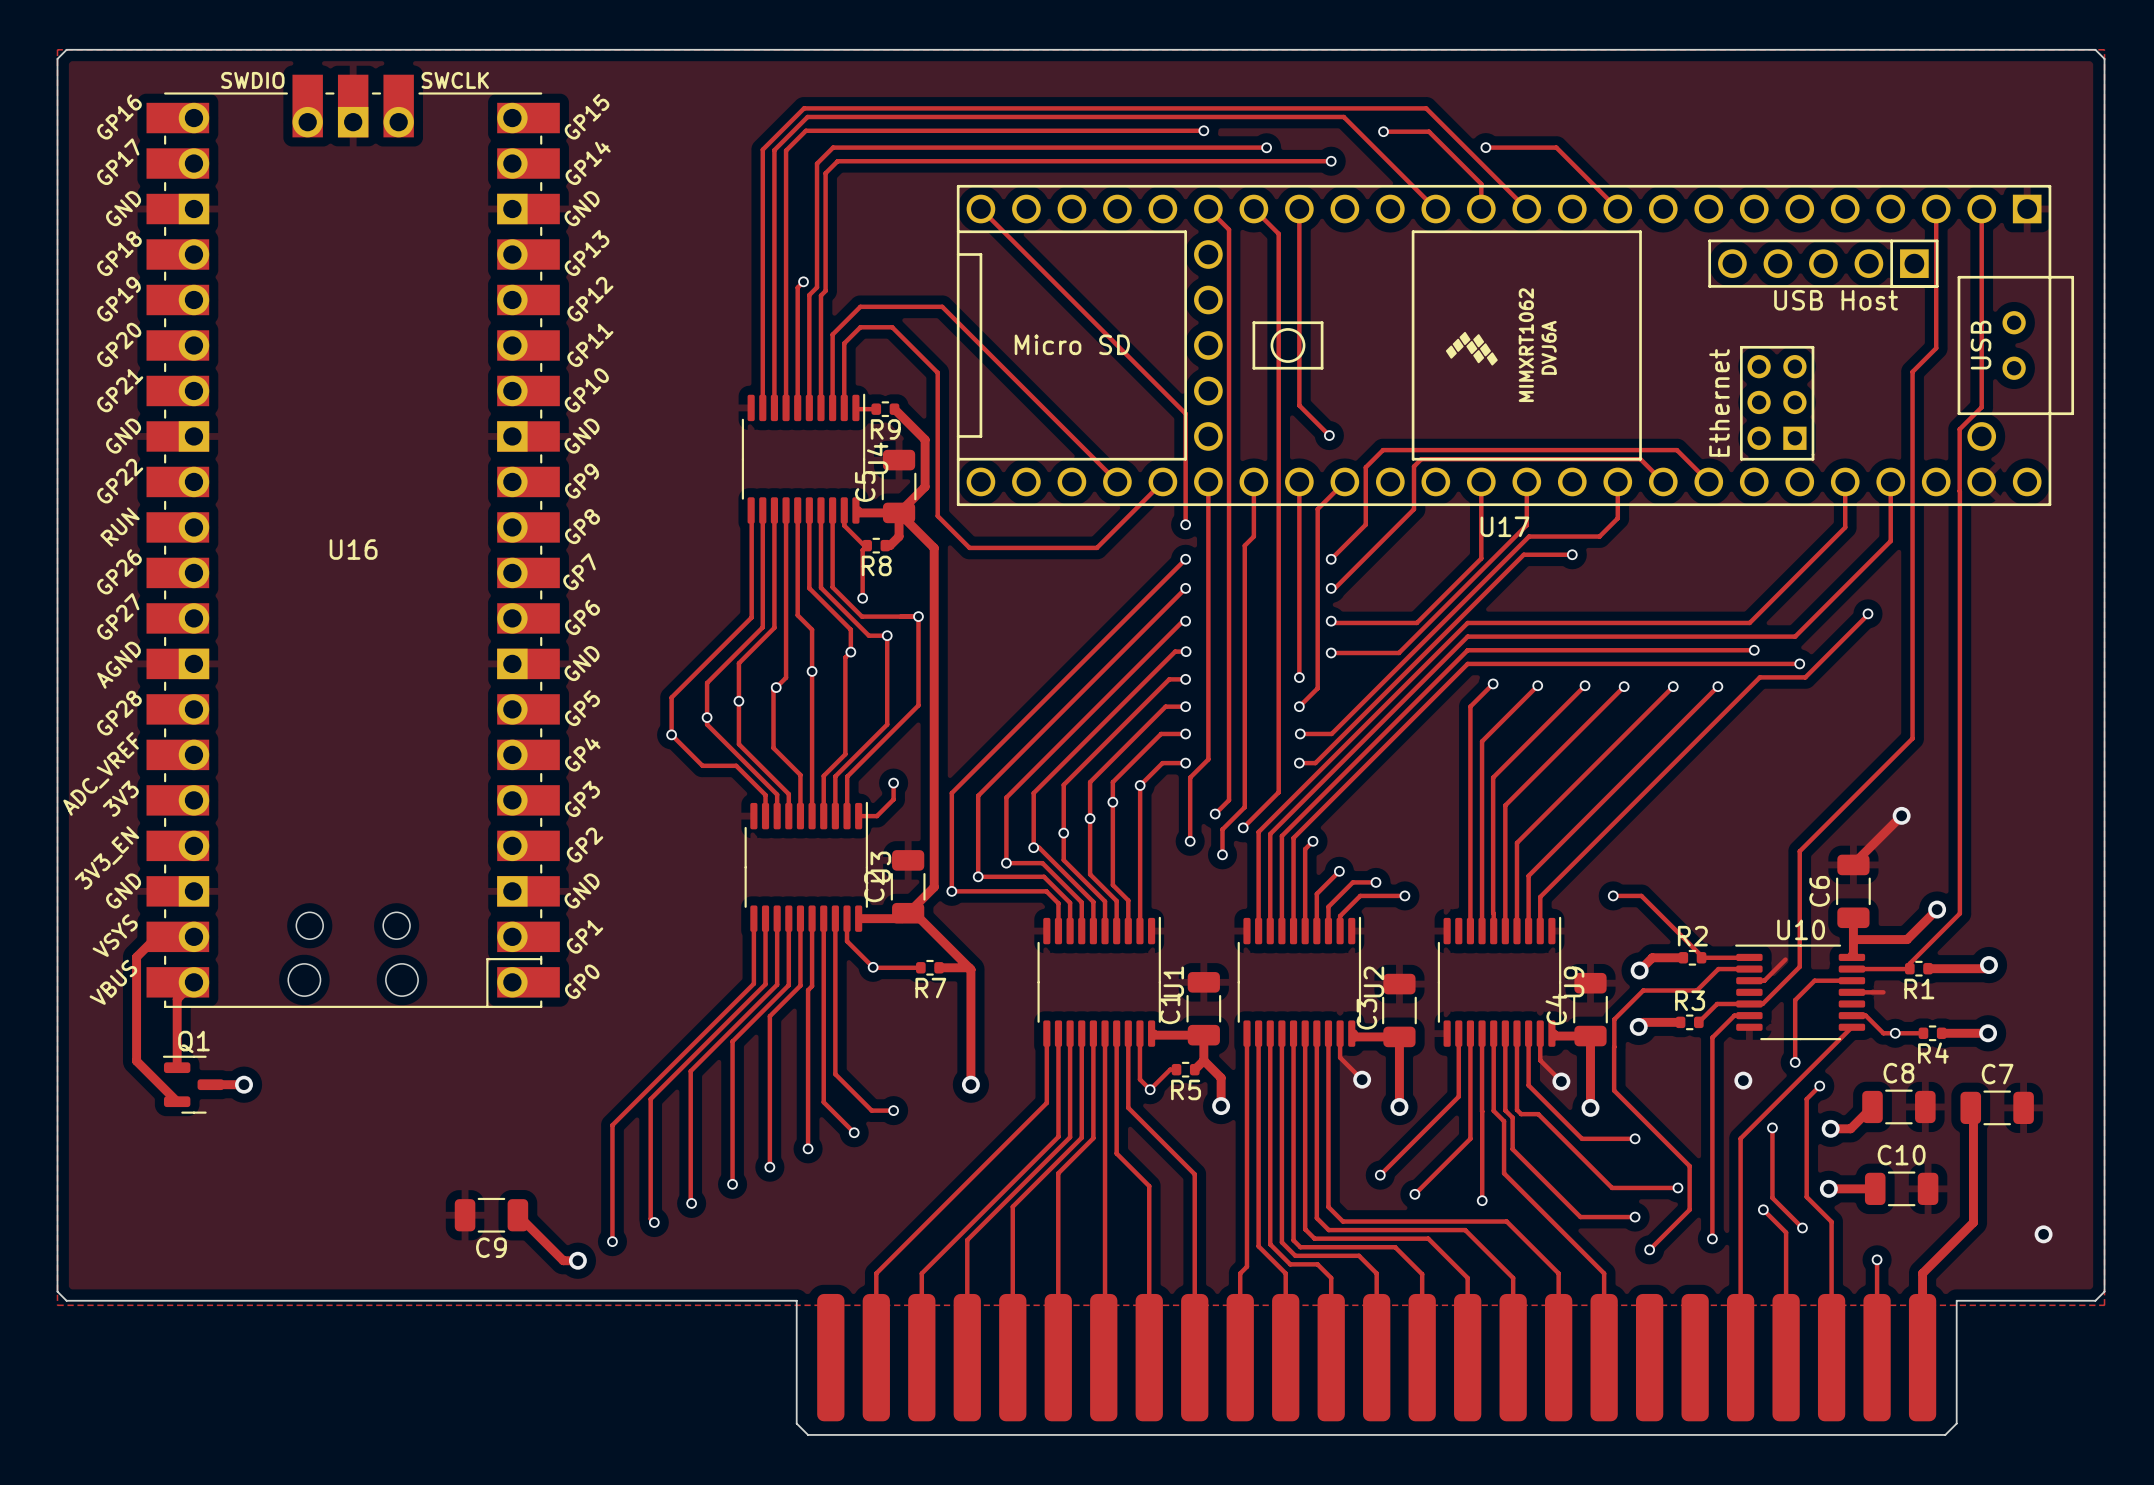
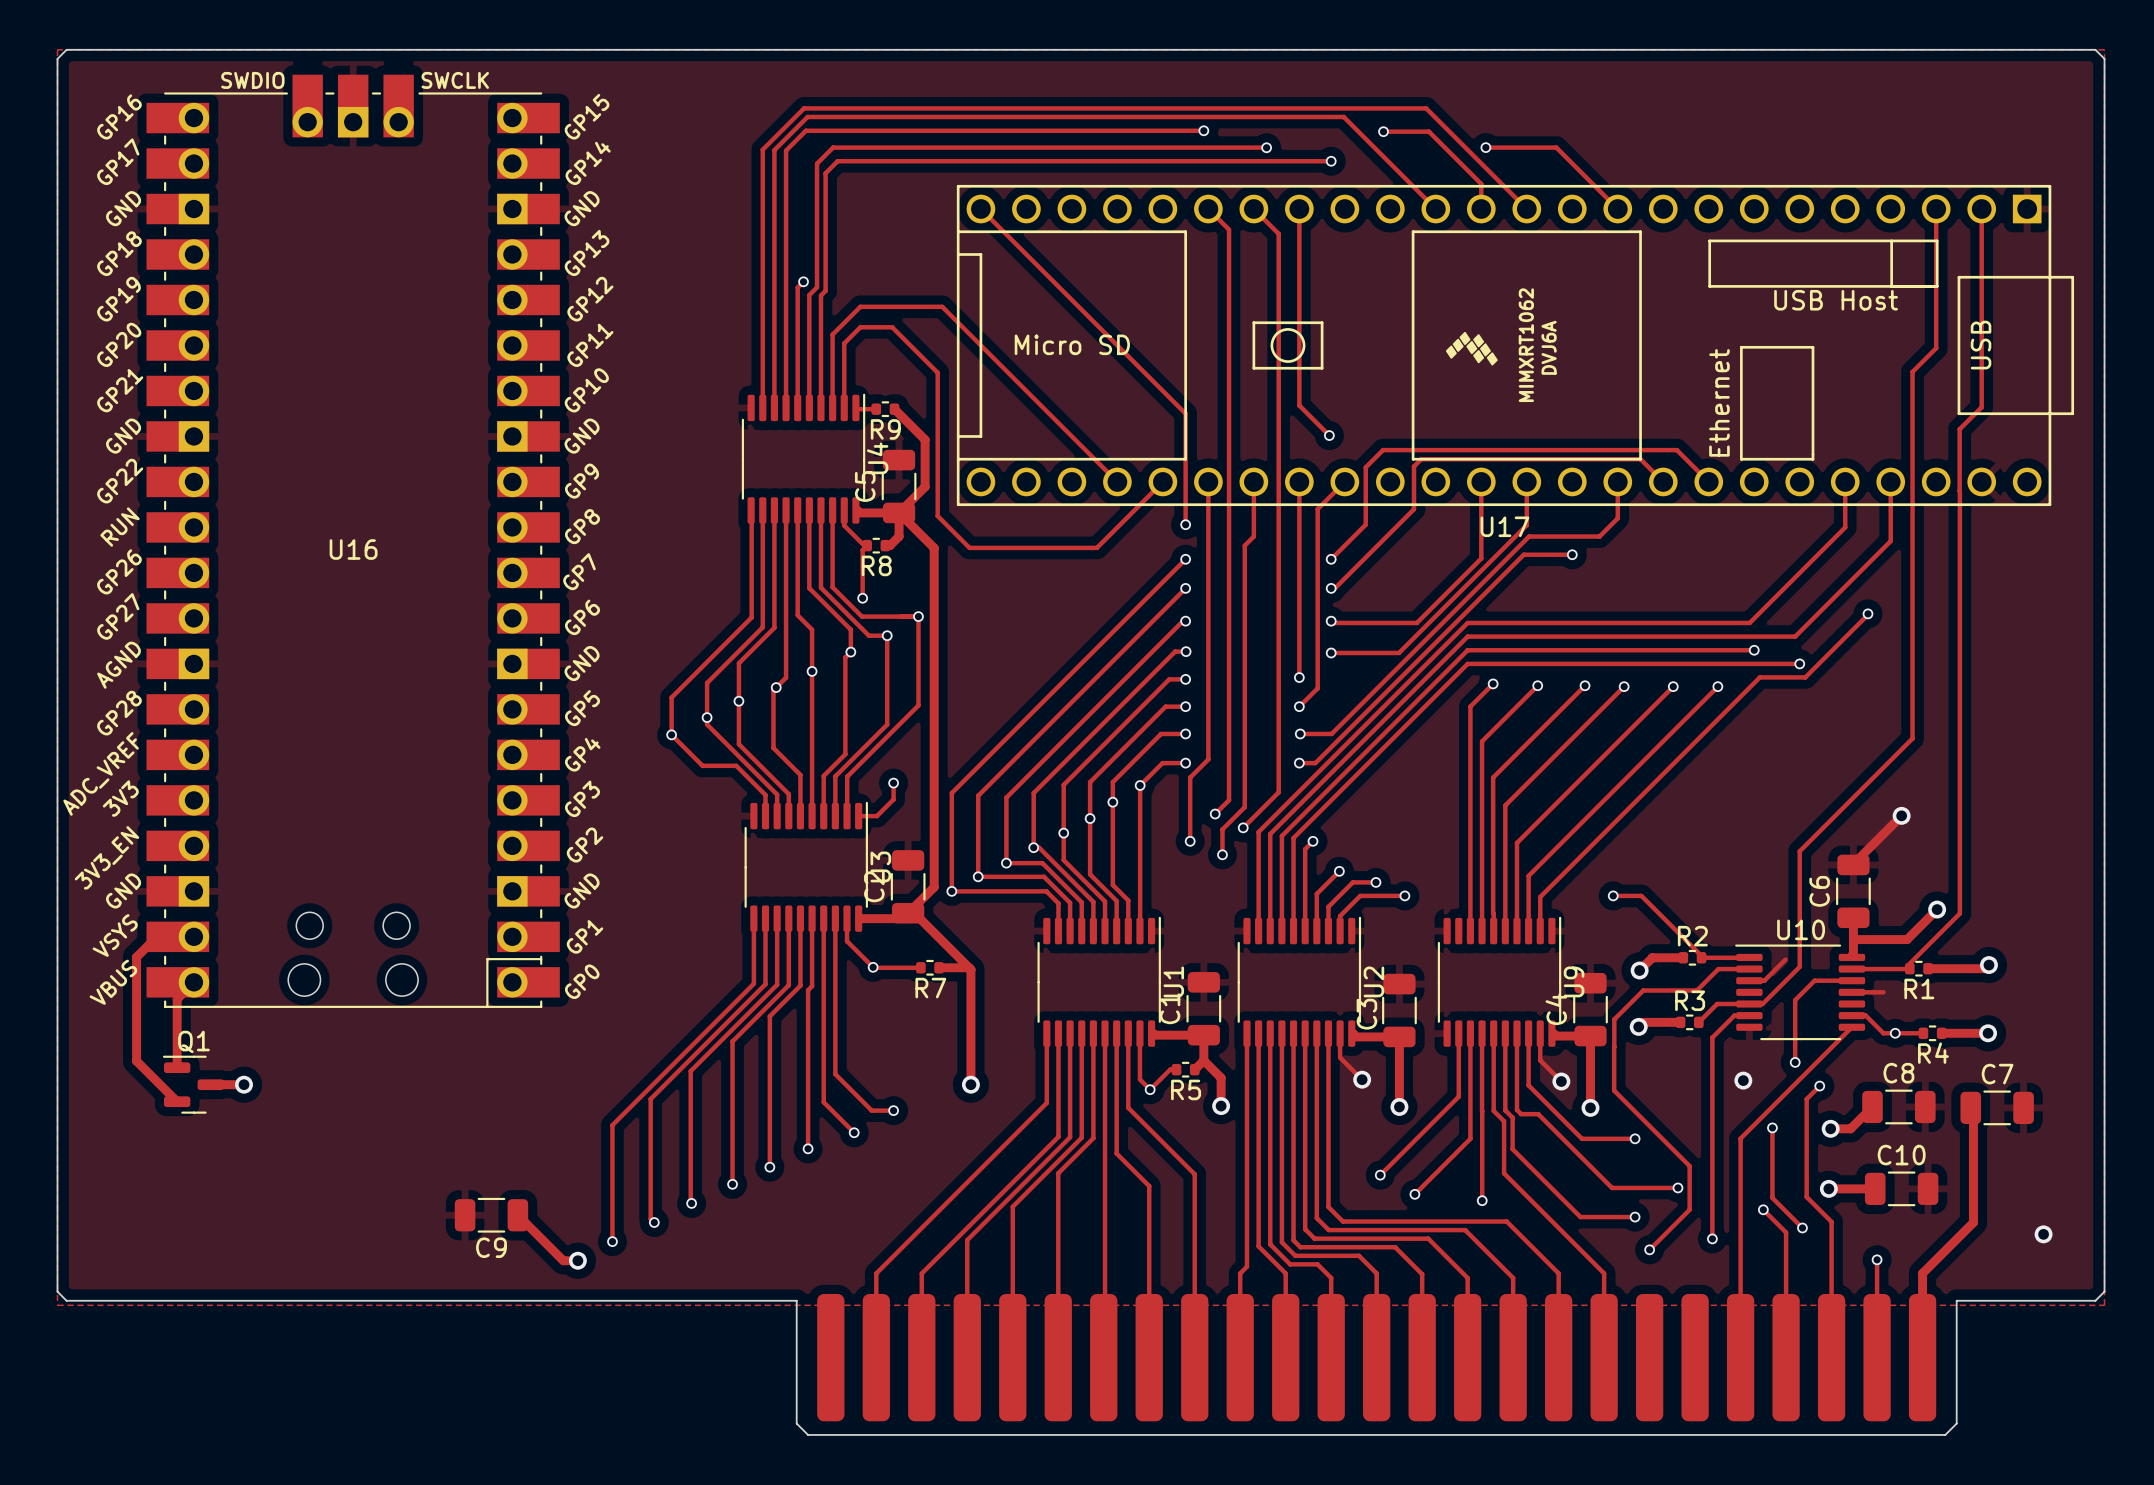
U17 footprint: [956, 184, 2075, 507] -> [956, 184, 2075, 507]

